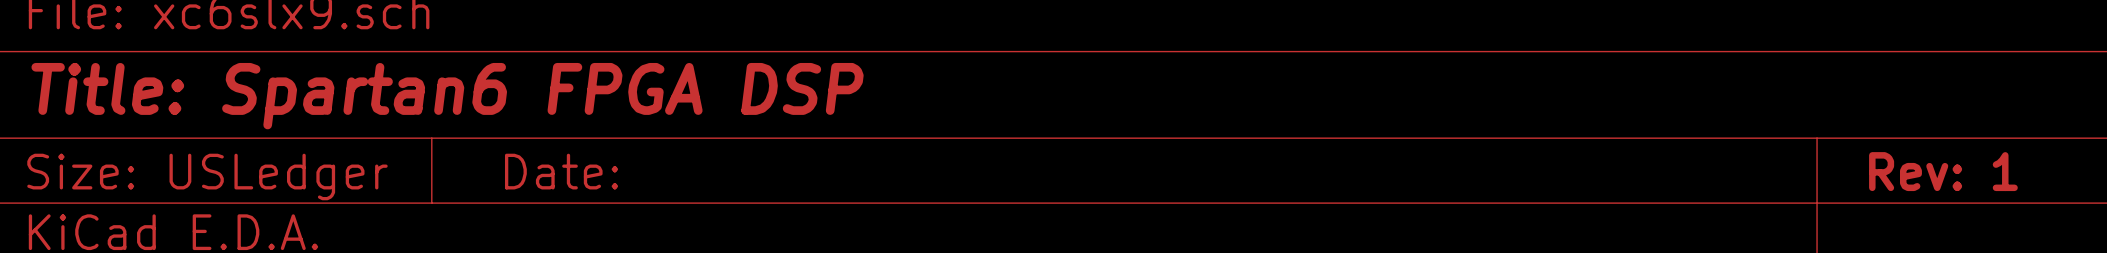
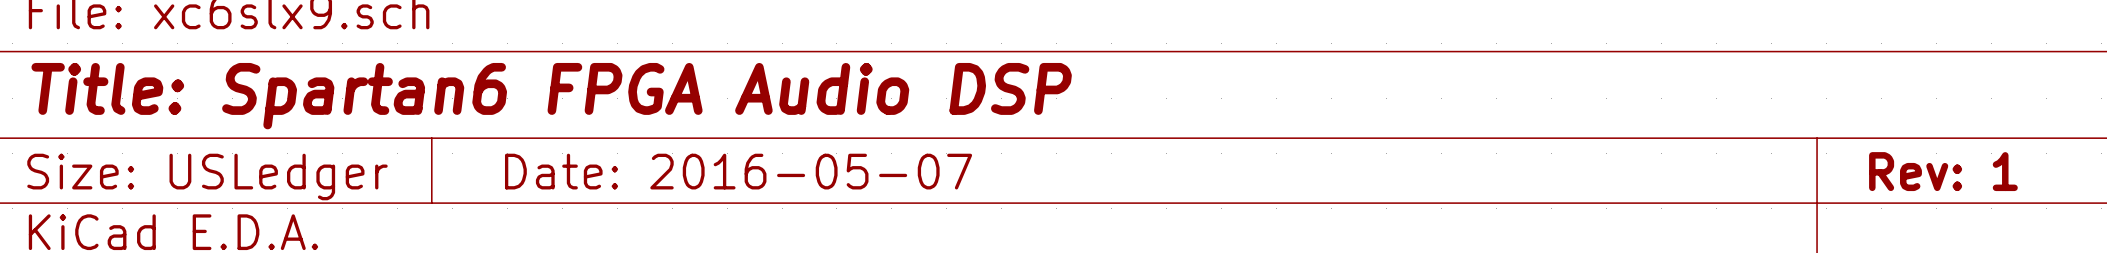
title block: Title: Spartan6 FPGA DSP (447, 96) -> Title: Spartan6 FPGA Audio DSP (551, 96)
title block: Date: (561, 171) -> Date: 2016-05-07 (738, 171)

